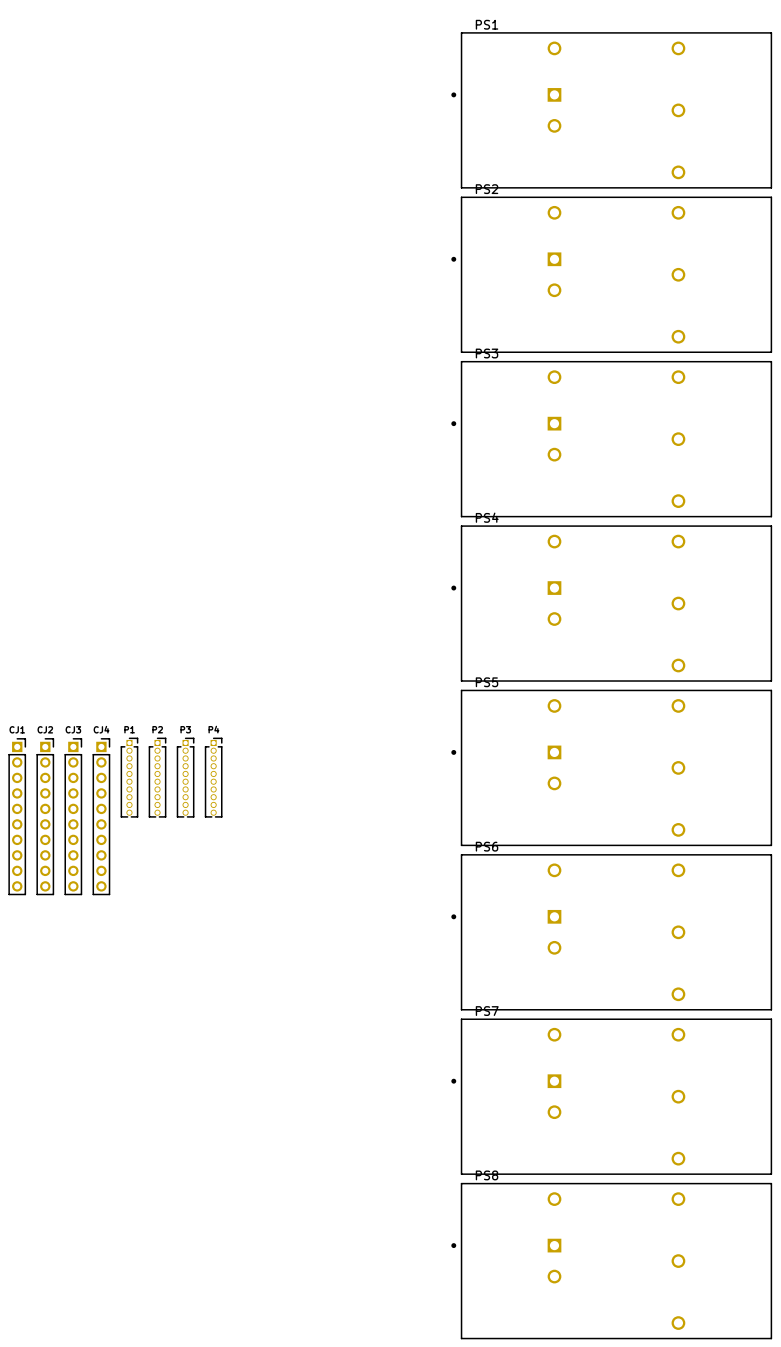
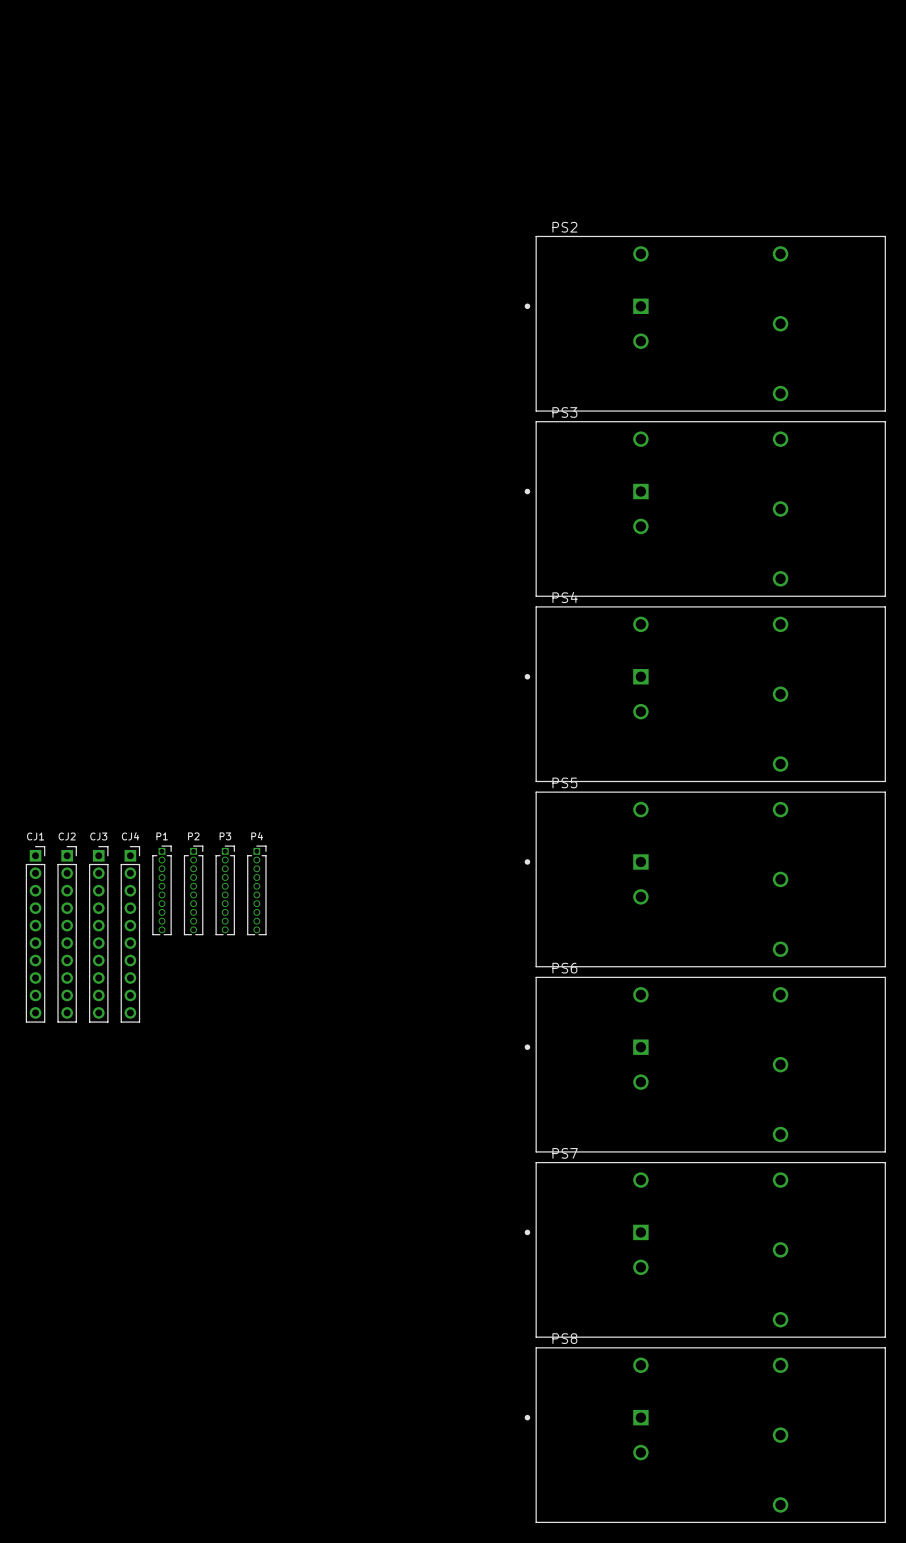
PS1: (611, 110) -> none

